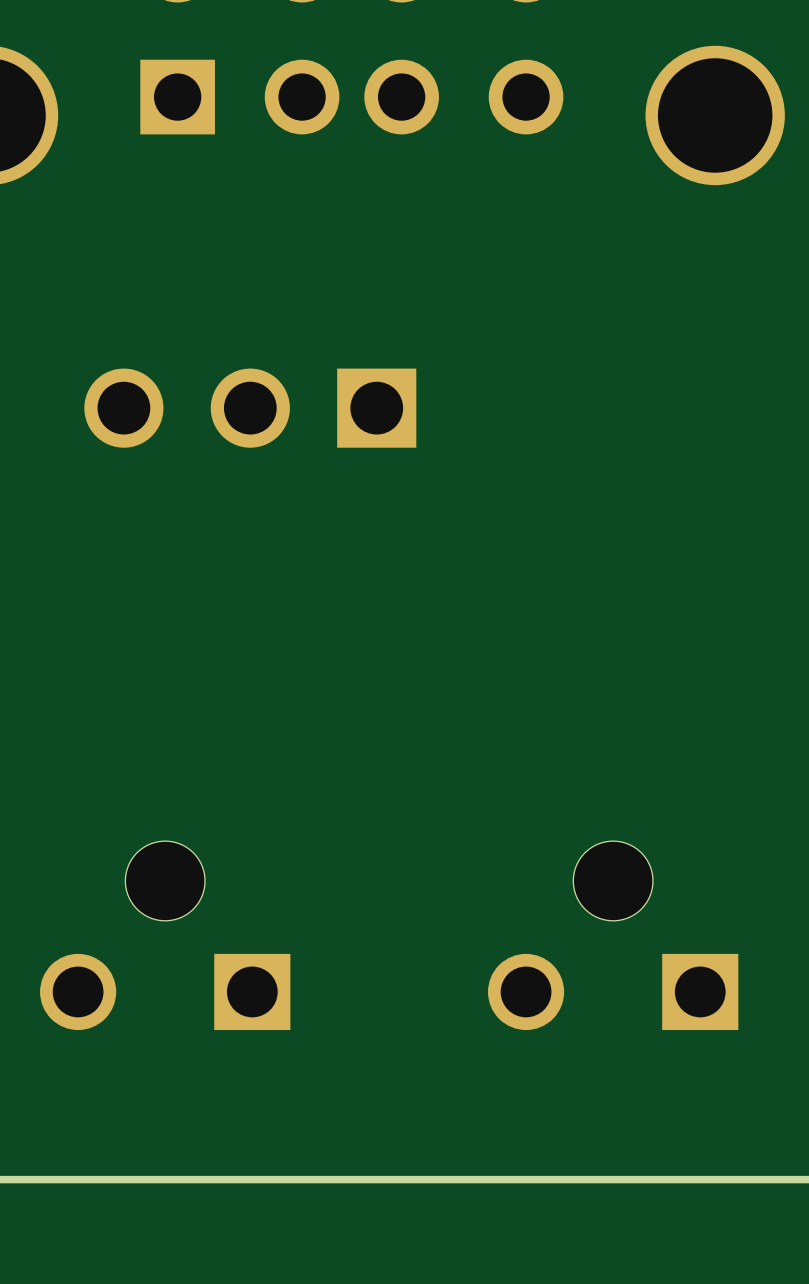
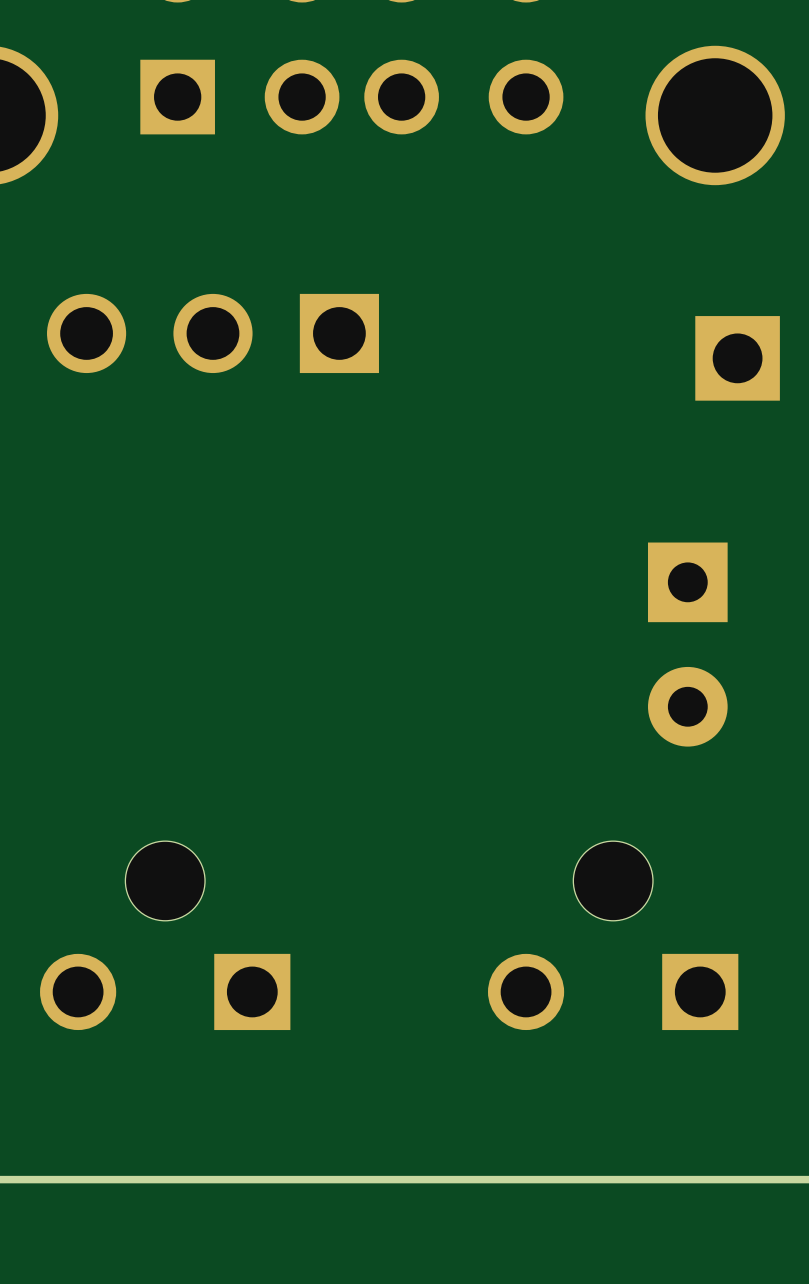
part: none -> (737, 358)
part position: (250, 408) -> (212, 333)
part: none -> (687, 644)

